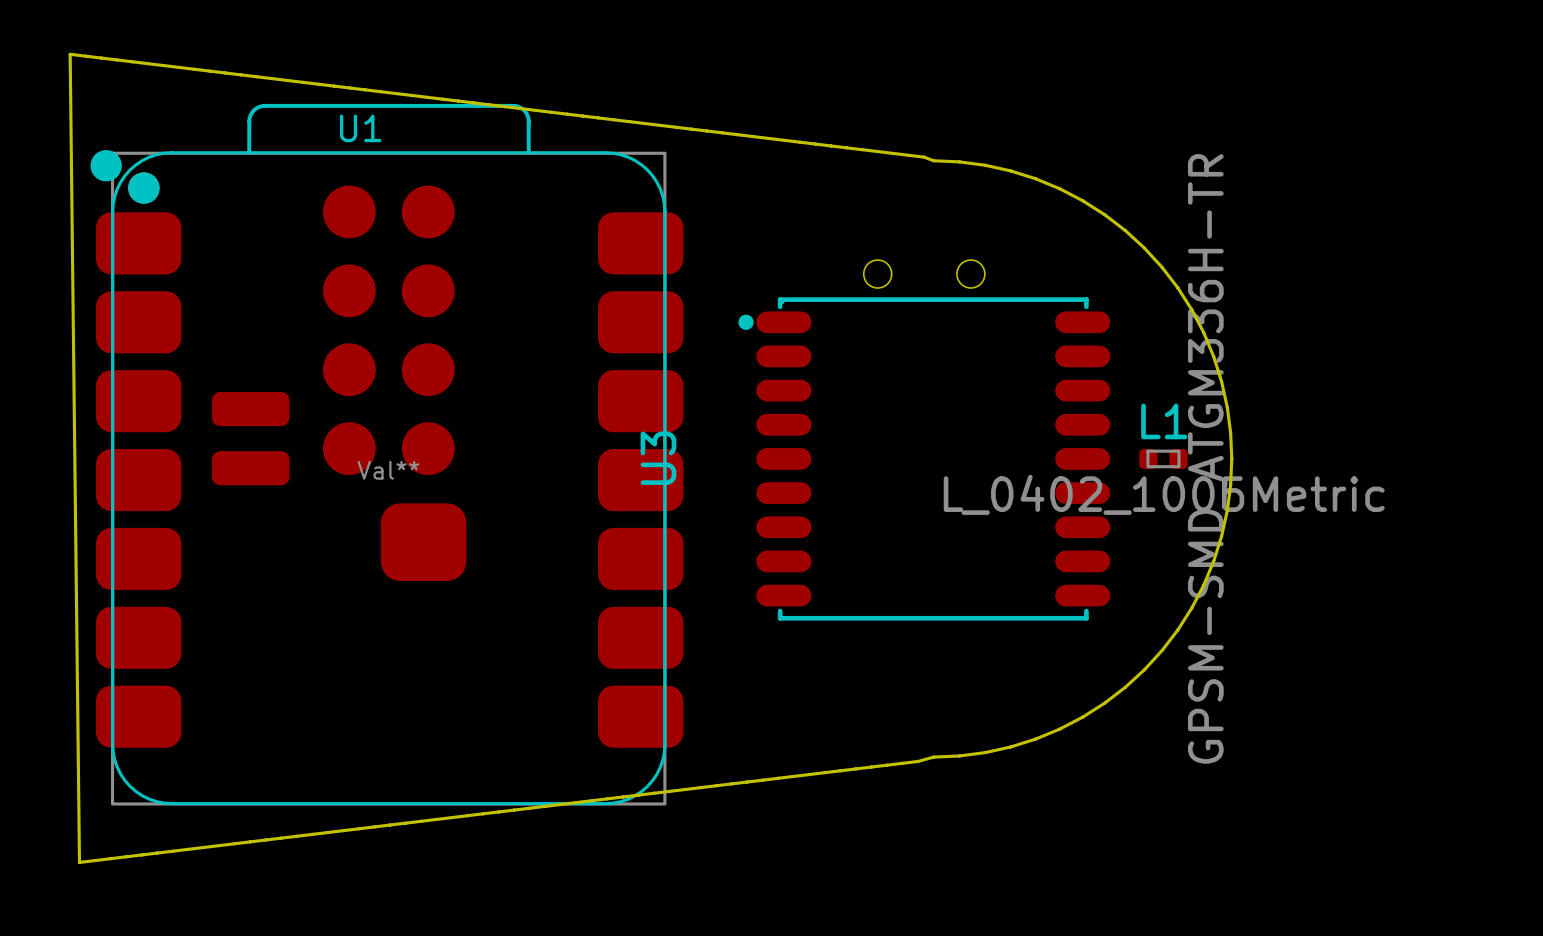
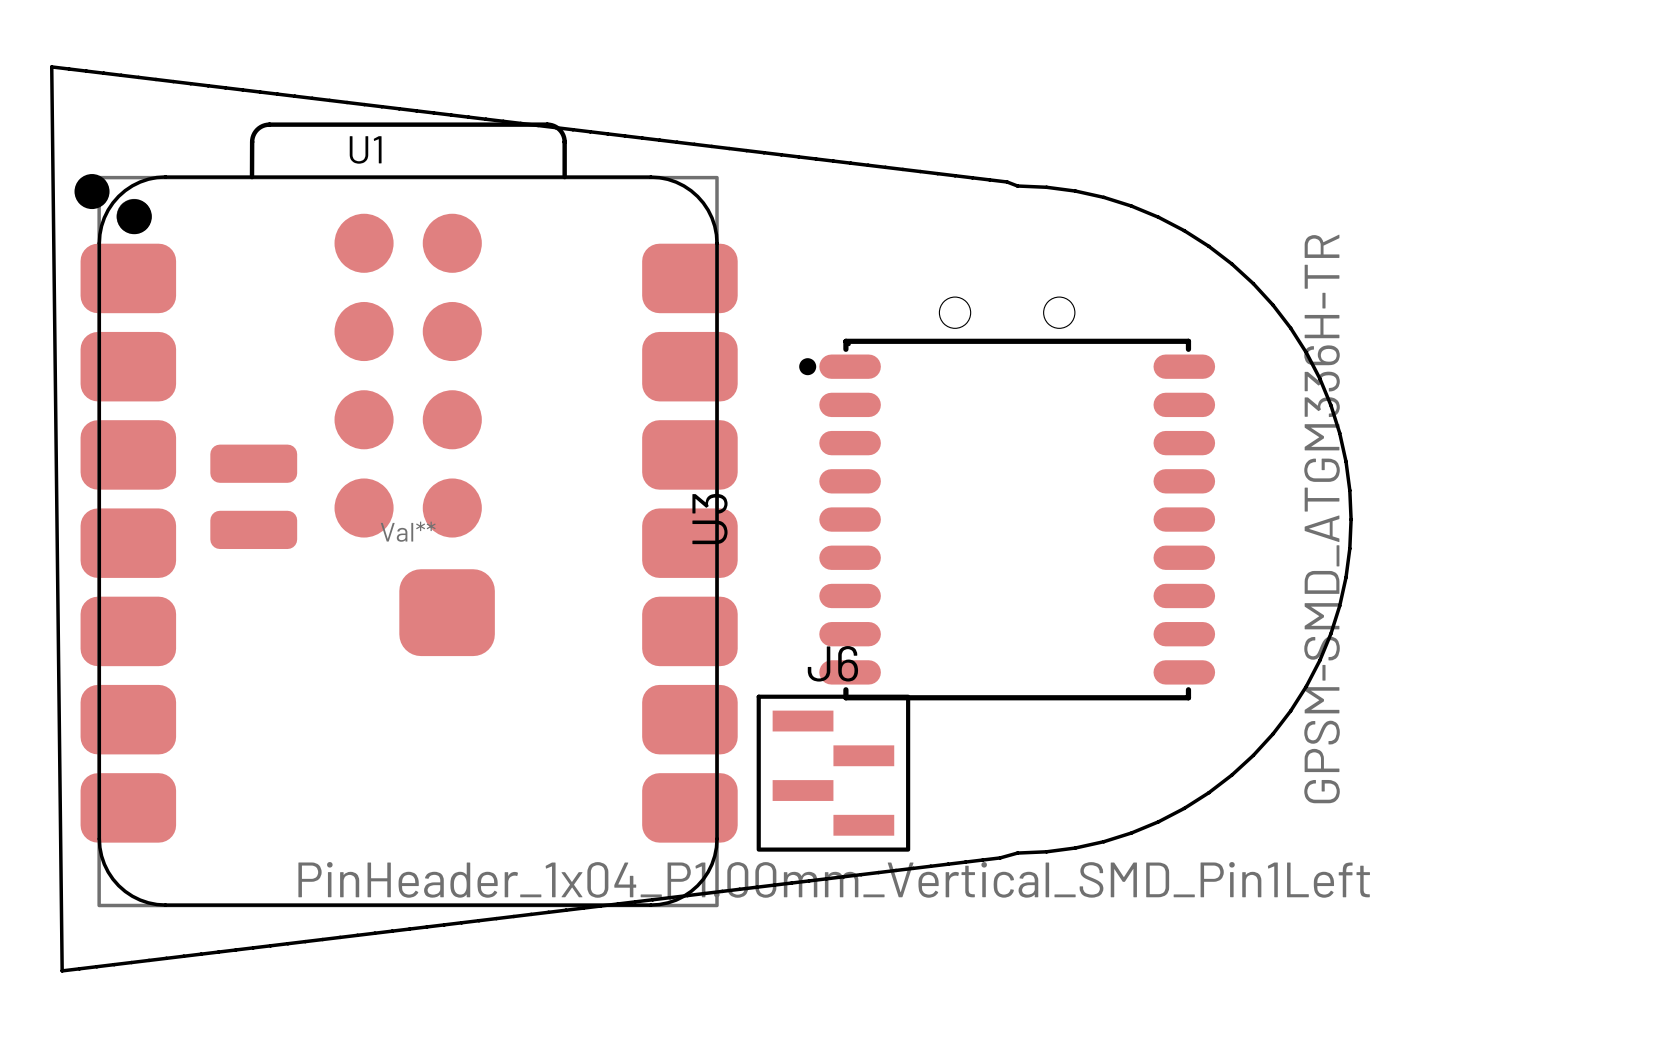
L1: L_0402_1005Metric (1163, 458) -> none
J6: none -> PinHeader_1x04_P1.00mm_Vertical_SMD_Pin1Left (833, 773)

